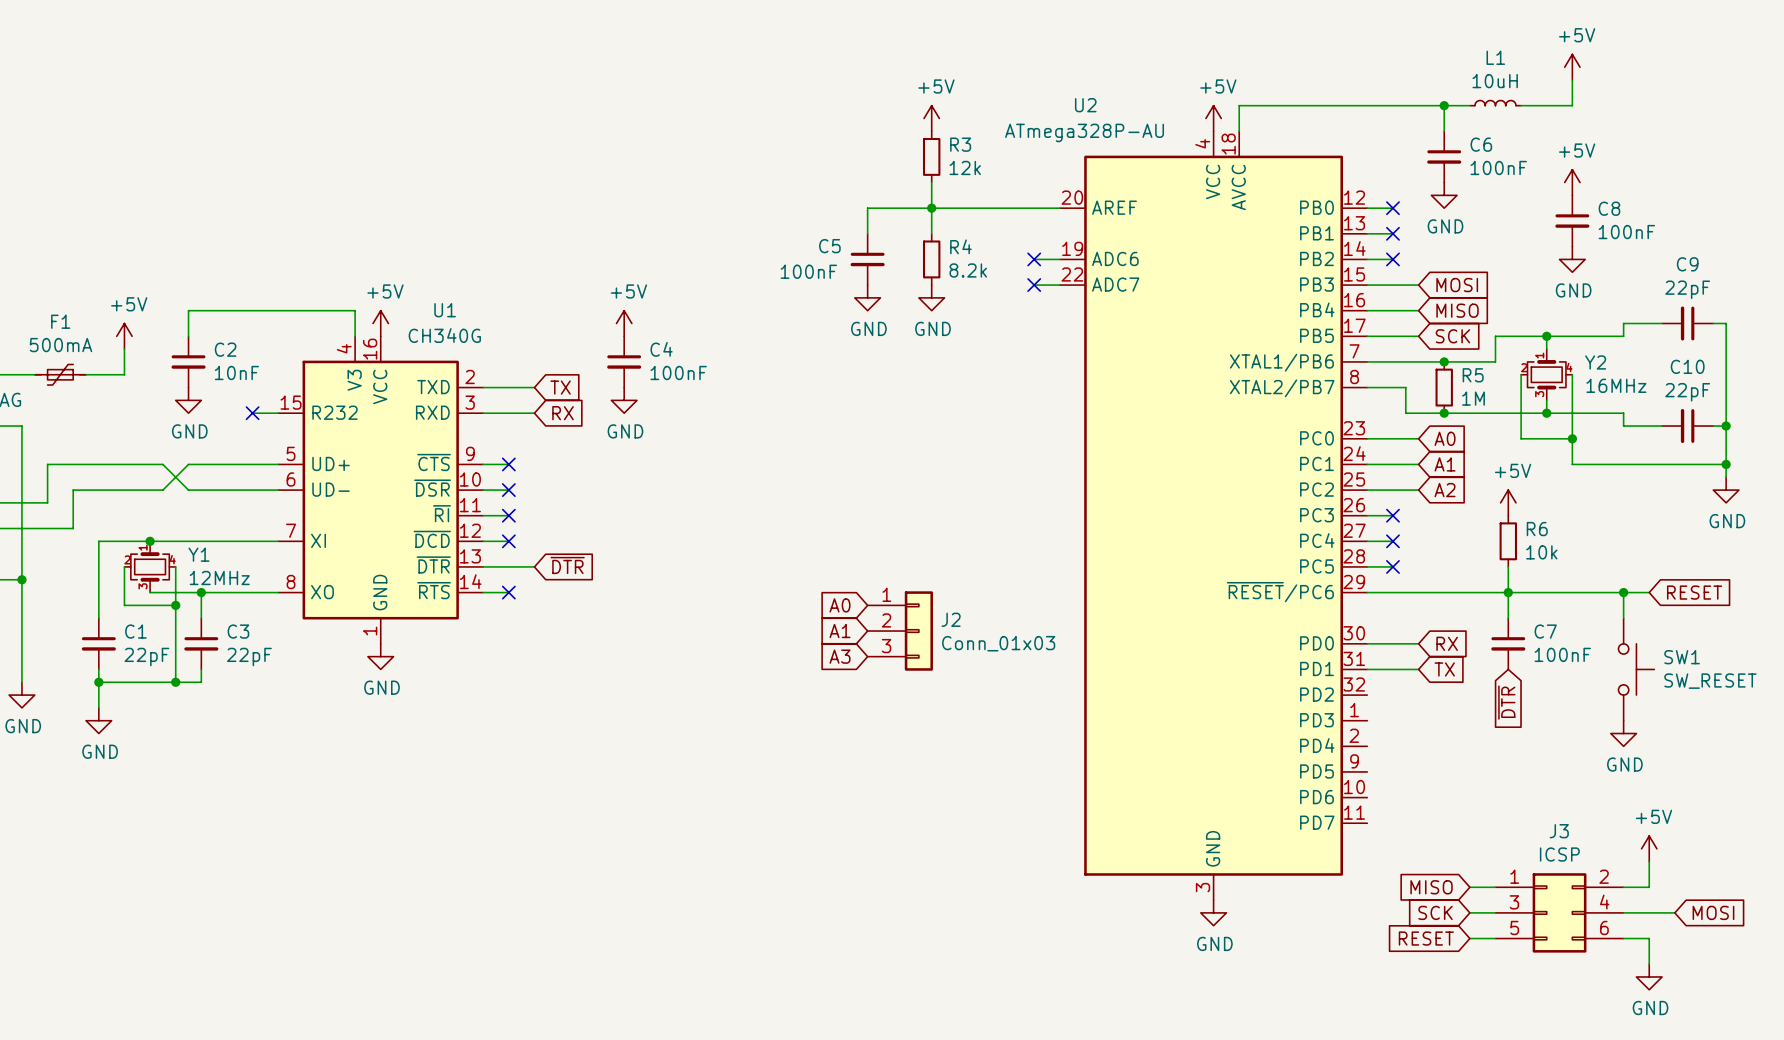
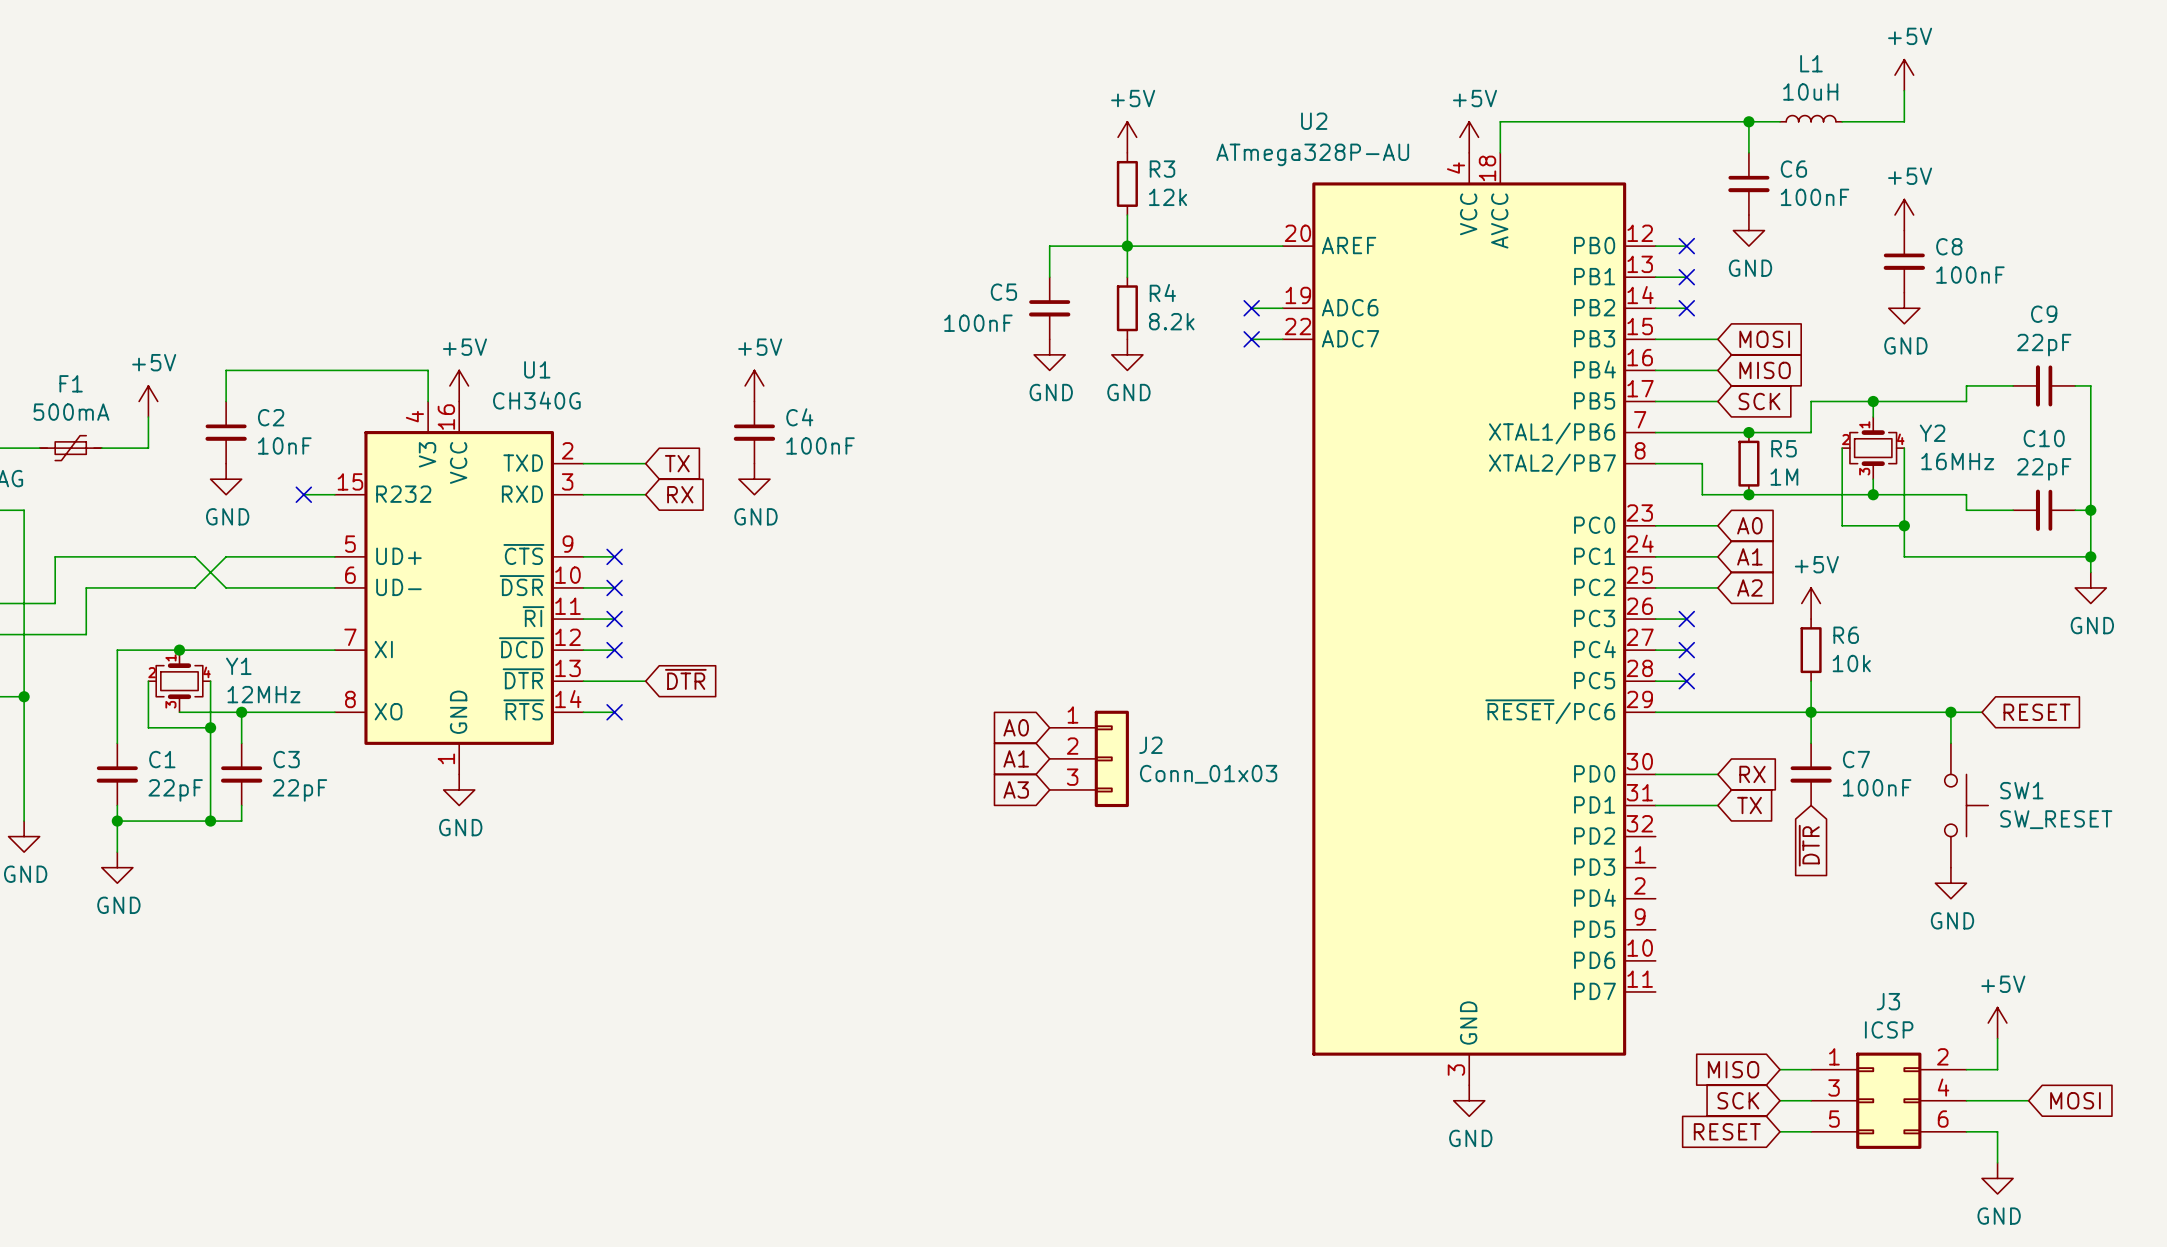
power symbol position: +5V (1508, 502) -> +5V (1811, 603)
R6 position: (1508, 541) -> (1811, 650)
wire: (1508, 566) (1508, 618) -> (1811, 681) (1811, 743)
junction position: (1508, 592) -> (1811, 712)
wire: (1623, 592) (1623, 618) -> (1950, 712) (1950, 743)
junction position: (1623, 592) -> (1950, 712)
wire: (1636, 592) (1649, 592) -> none
global label position: RESET (1694, 592) -> RESET (2036, 712)
C7 position: (1508, 643) -> (1811, 774)
SW1 position: (1636, 669) -> (1966, 805)
global label position: ~{DTR} (1506, 702) -> ~{DTR} (1809, 845)
power symbol position: GND (1623, 733) -> GND (1950, 883)

